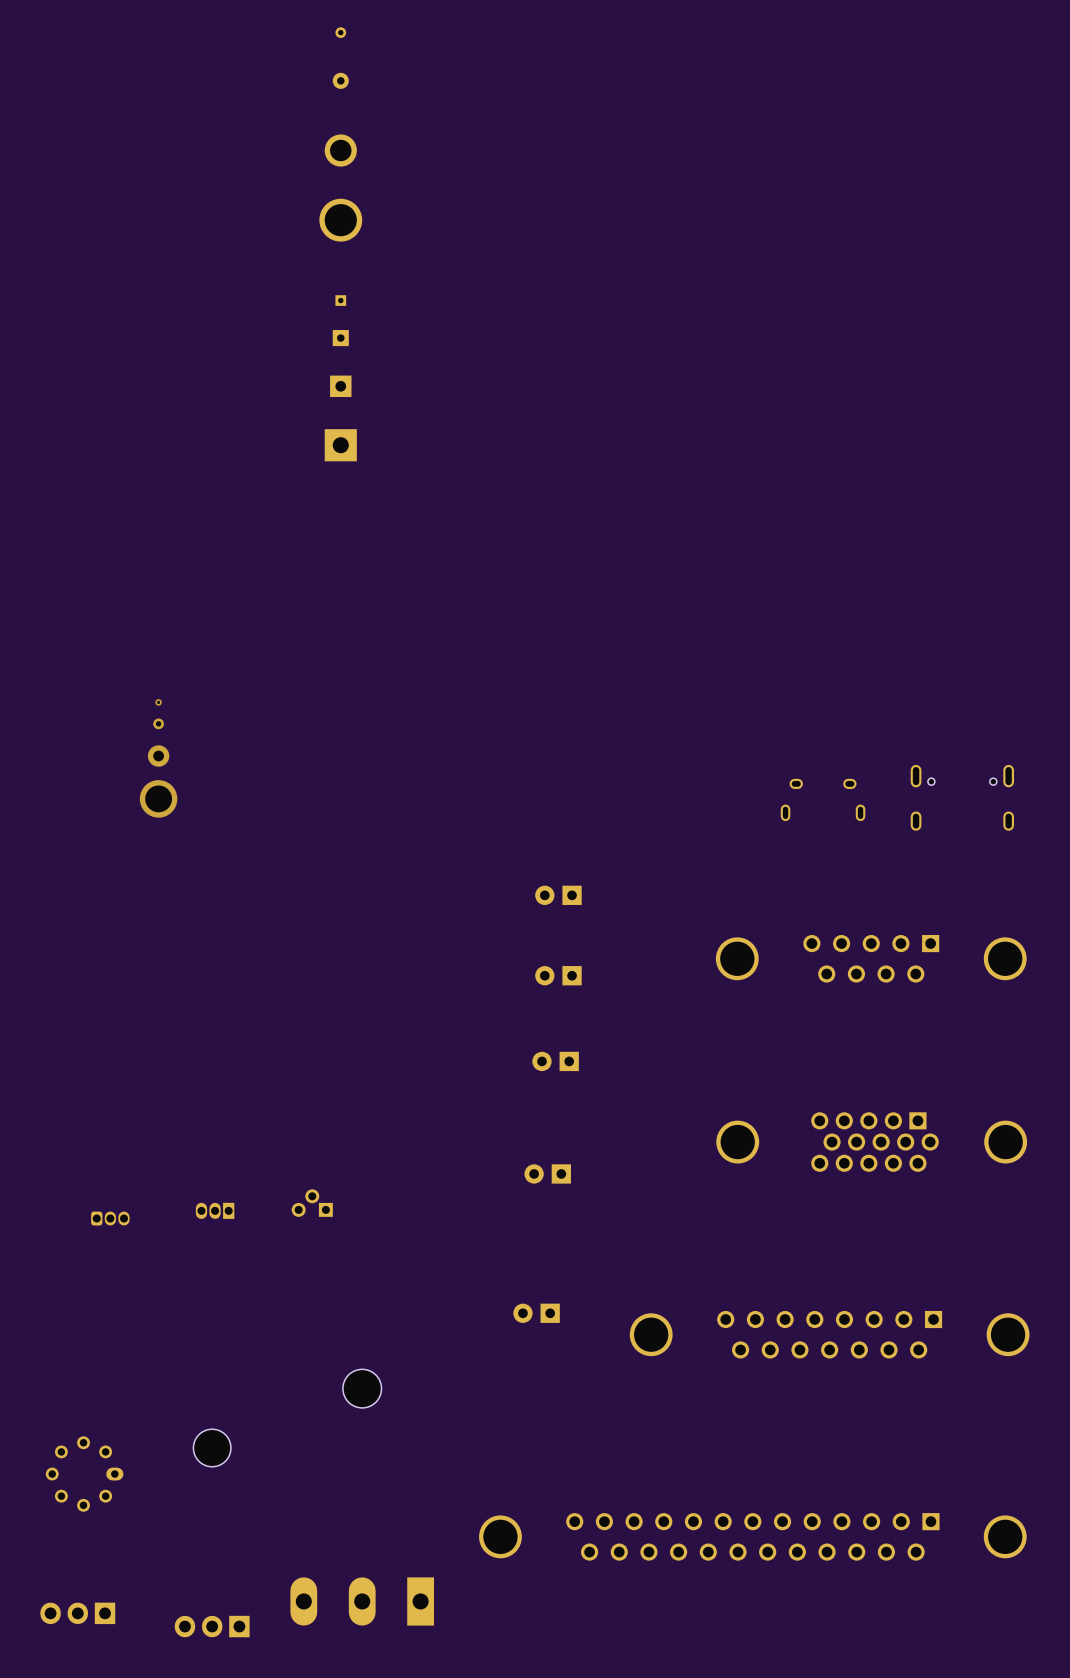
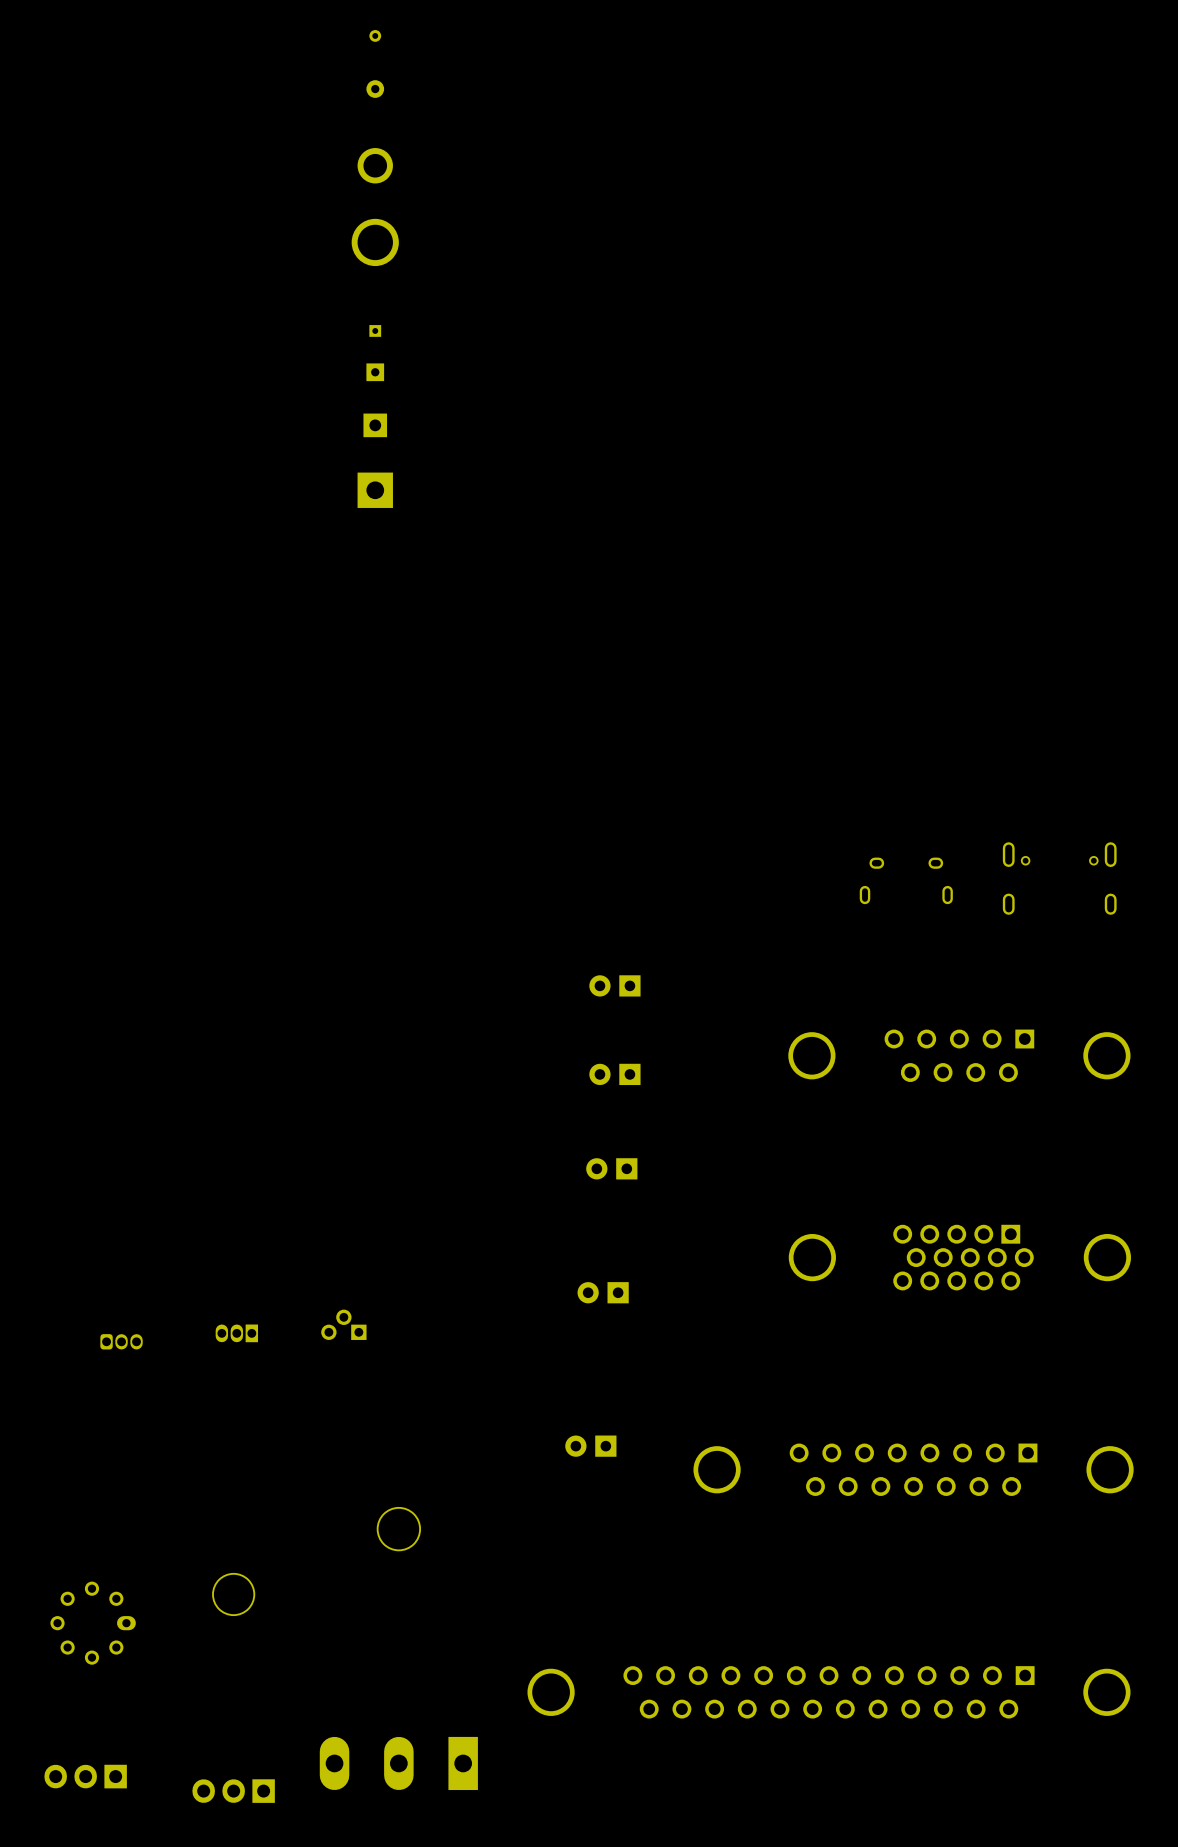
via: (158, 702) -> none
via: (158, 723) -> none
via: (158, 756) -> none
via: (158, 798) -> none

